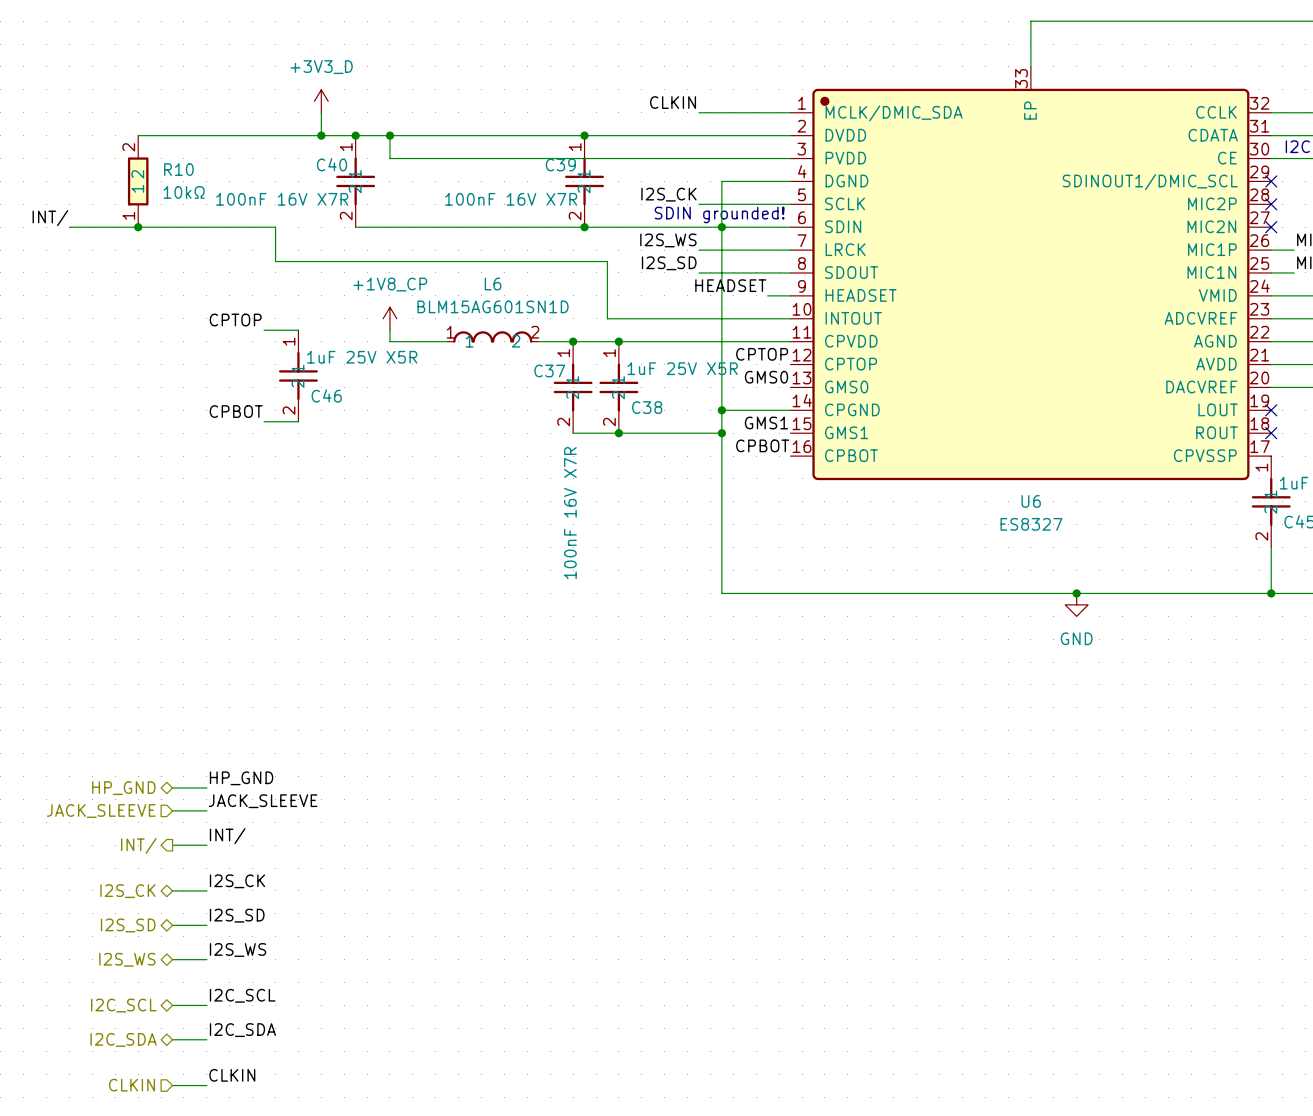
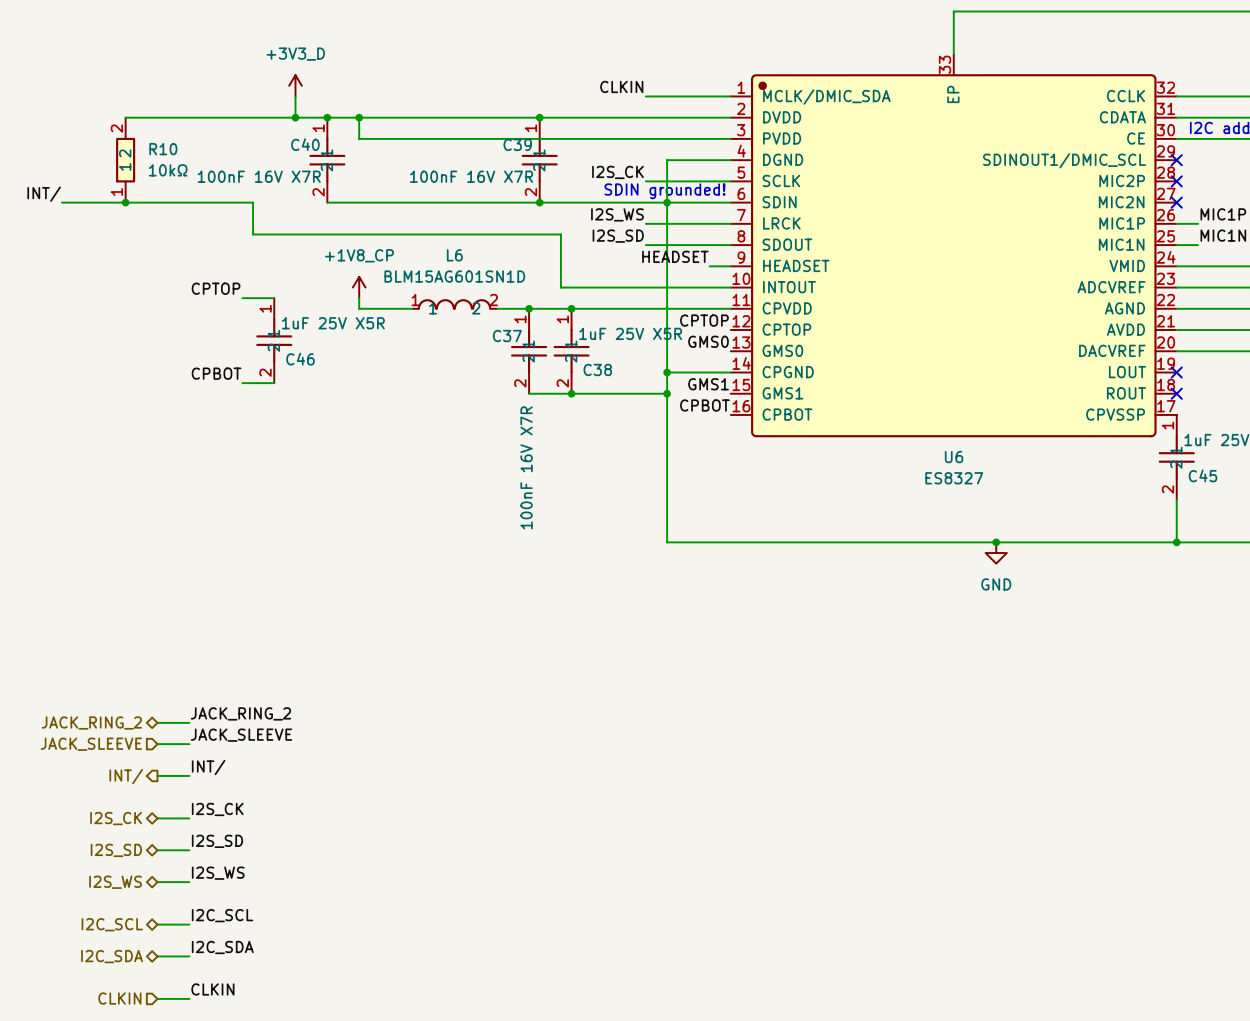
label: HP_GND (241, 778) -> JACK_RING_2 (240, 713)
hierarchical label: HP_GND (123, 788) -> JACK_RING_2 (91, 722)

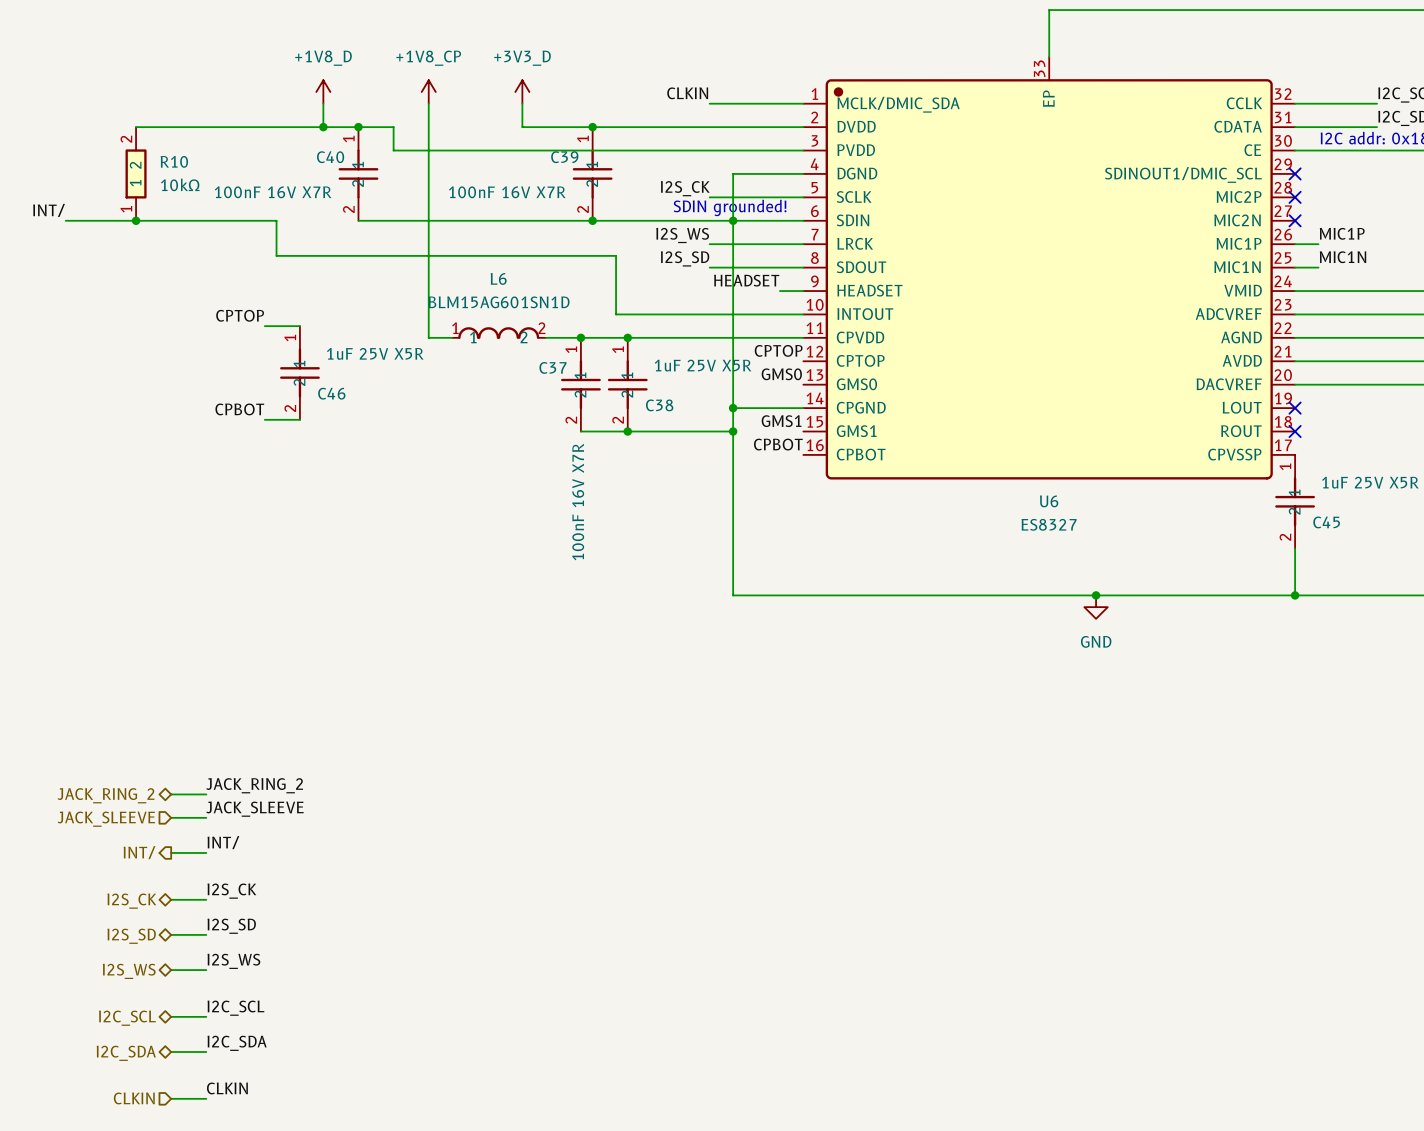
power symbol: +3V3_D (295, 85) -> +1V8_D (323, 92)
power symbol: none -> +3V3_D (522, 92)
wire: (359, 117) (476, 117) -> (522, 103) (522, 127)
junction: (359, 117) -> none
power symbol position: +1V8_CP (359, 287) -> +1V8_CP (428, 92)
wire: (359, 298) (359, 308) (391, 308) -> (428, 103) (428, 337)

